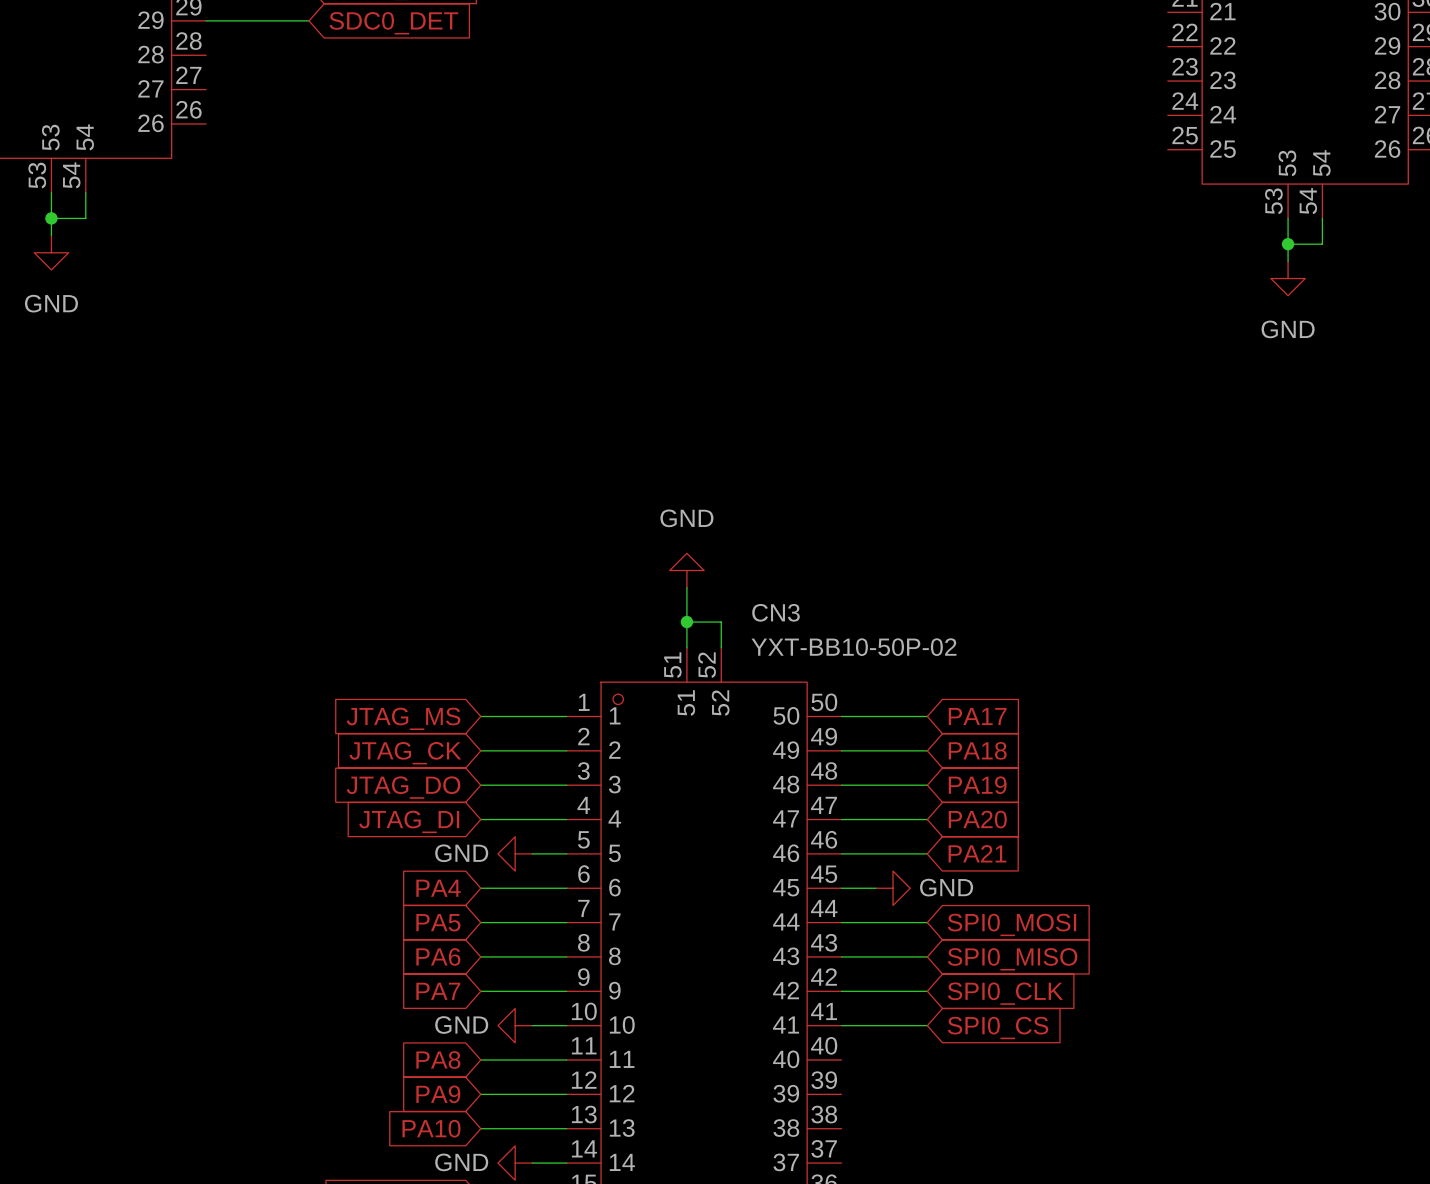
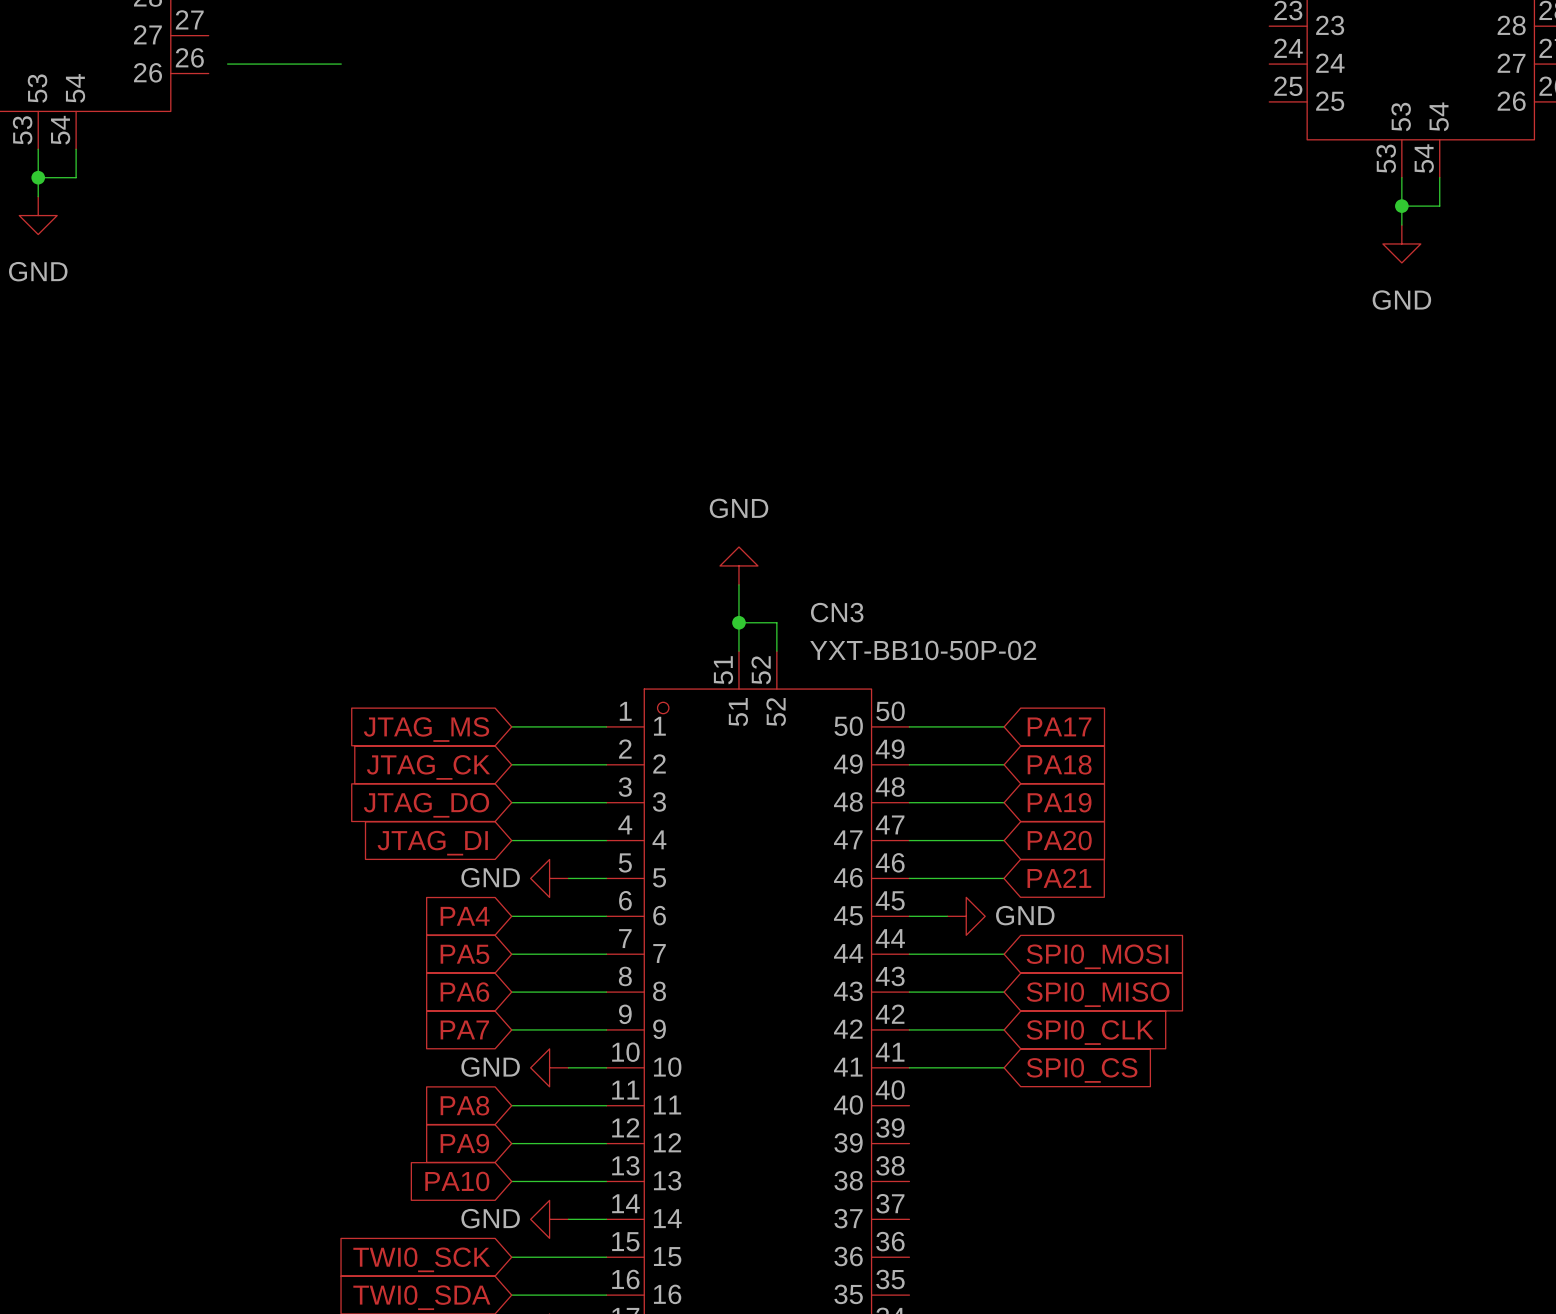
wire: none -> (227, 64) (341, 64)

